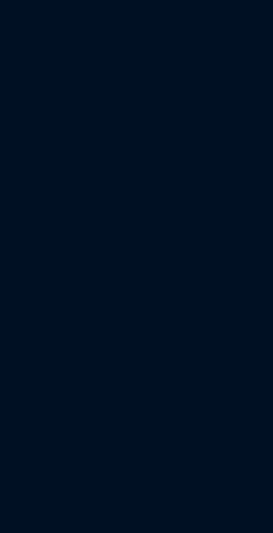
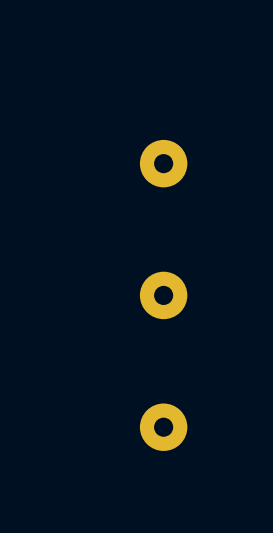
part: none -> (163, 163)
part: none -> (163, 295)
part: none -> (163, 427)

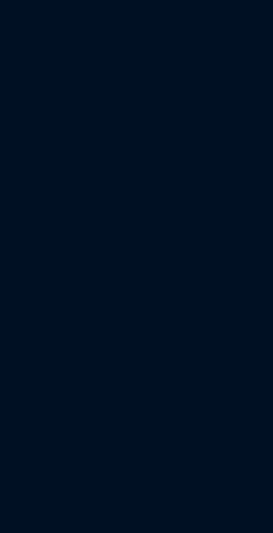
part: (163, 163) -> none
part: (163, 295) -> none
part: (163, 427) -> none

